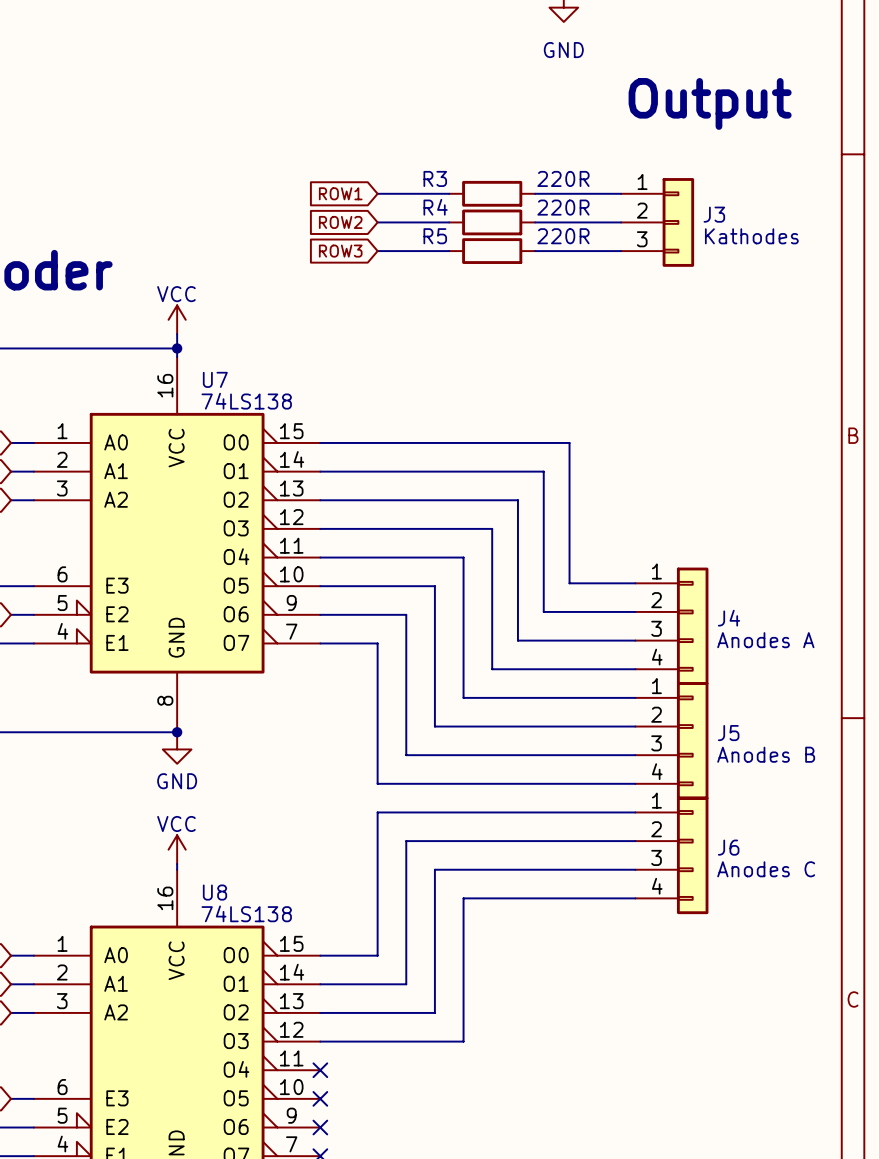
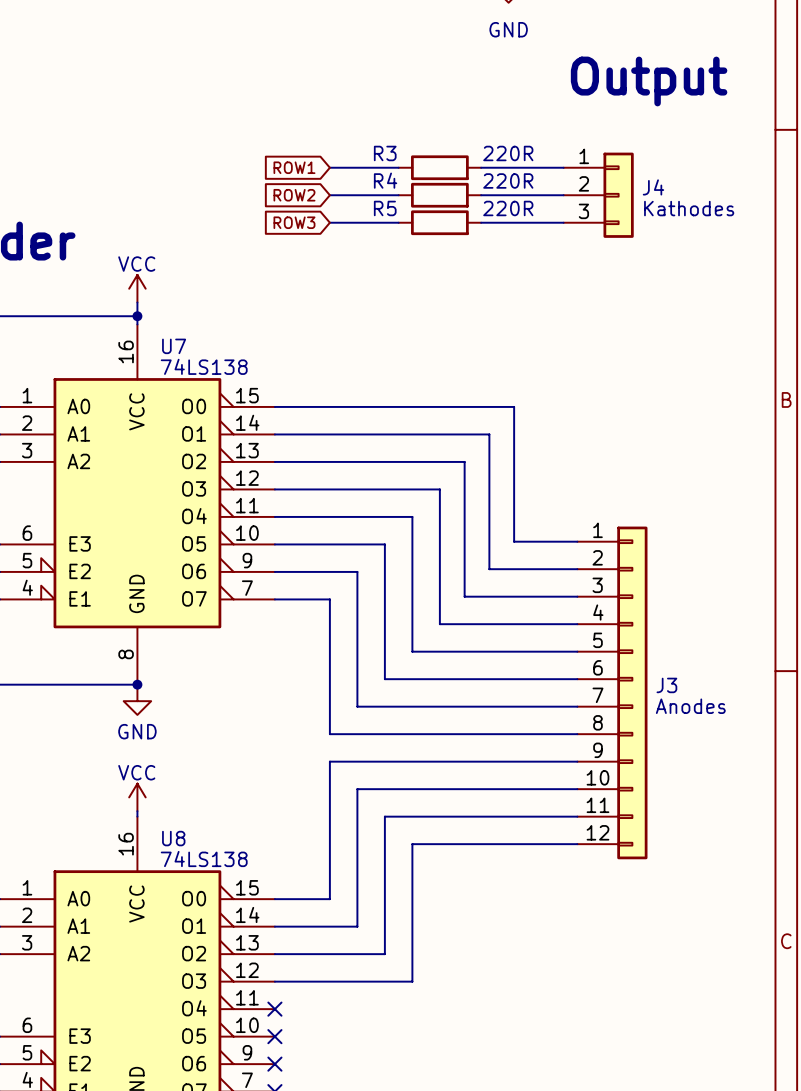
J3 name: J3 (714, 214) -> J4 (653, 187)
J4: Anodes A (671, 626) -> none
J5: Anodes B (671, 740) -> none
J3: none -> Anodes (612, 692)
J6: Anodes C (671, 855) -> none

